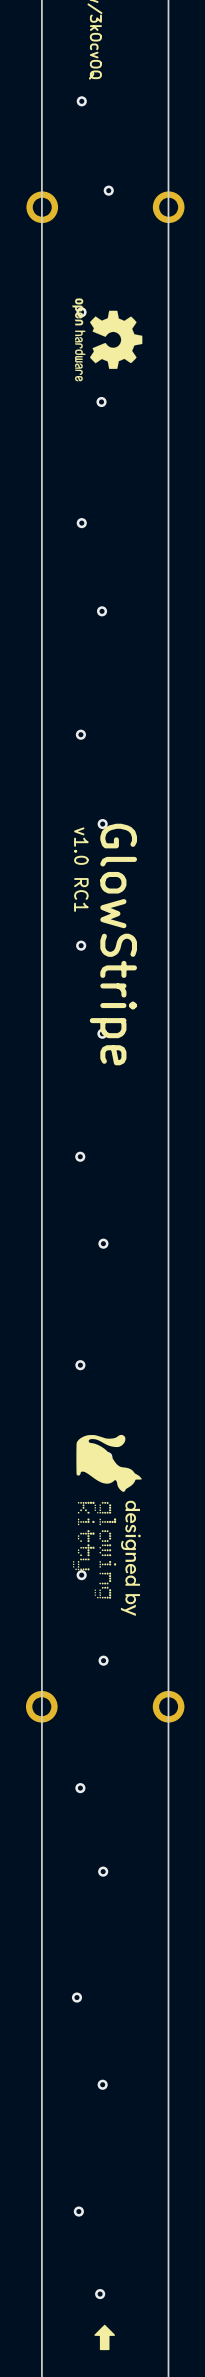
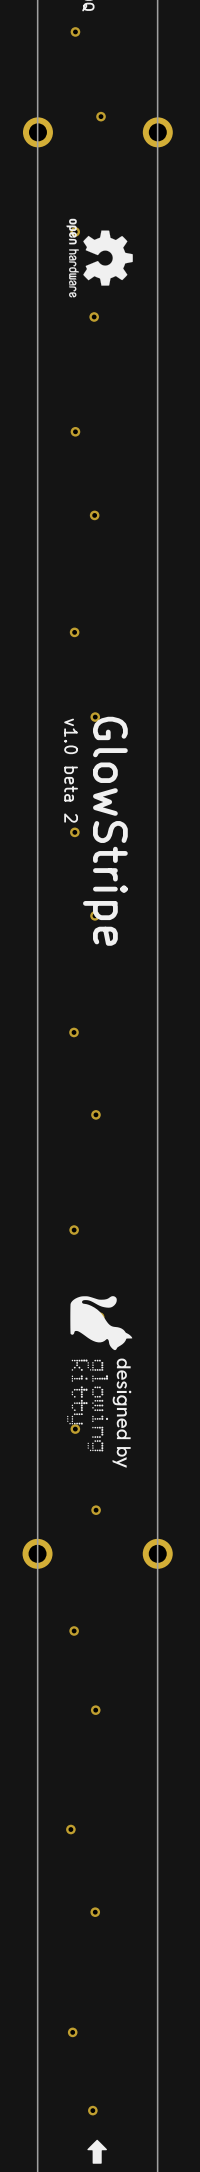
text: v1.0 RC1 (81, 869) -> none
text: none -> v1.0 beta 2 (71, 770)

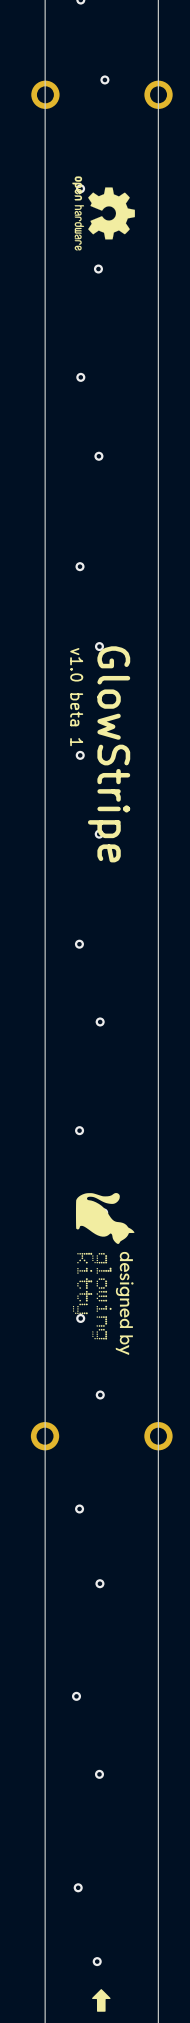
text: v1.0 beta 2 (71, 770) -> v1.0 beta 1 (76, 697)

